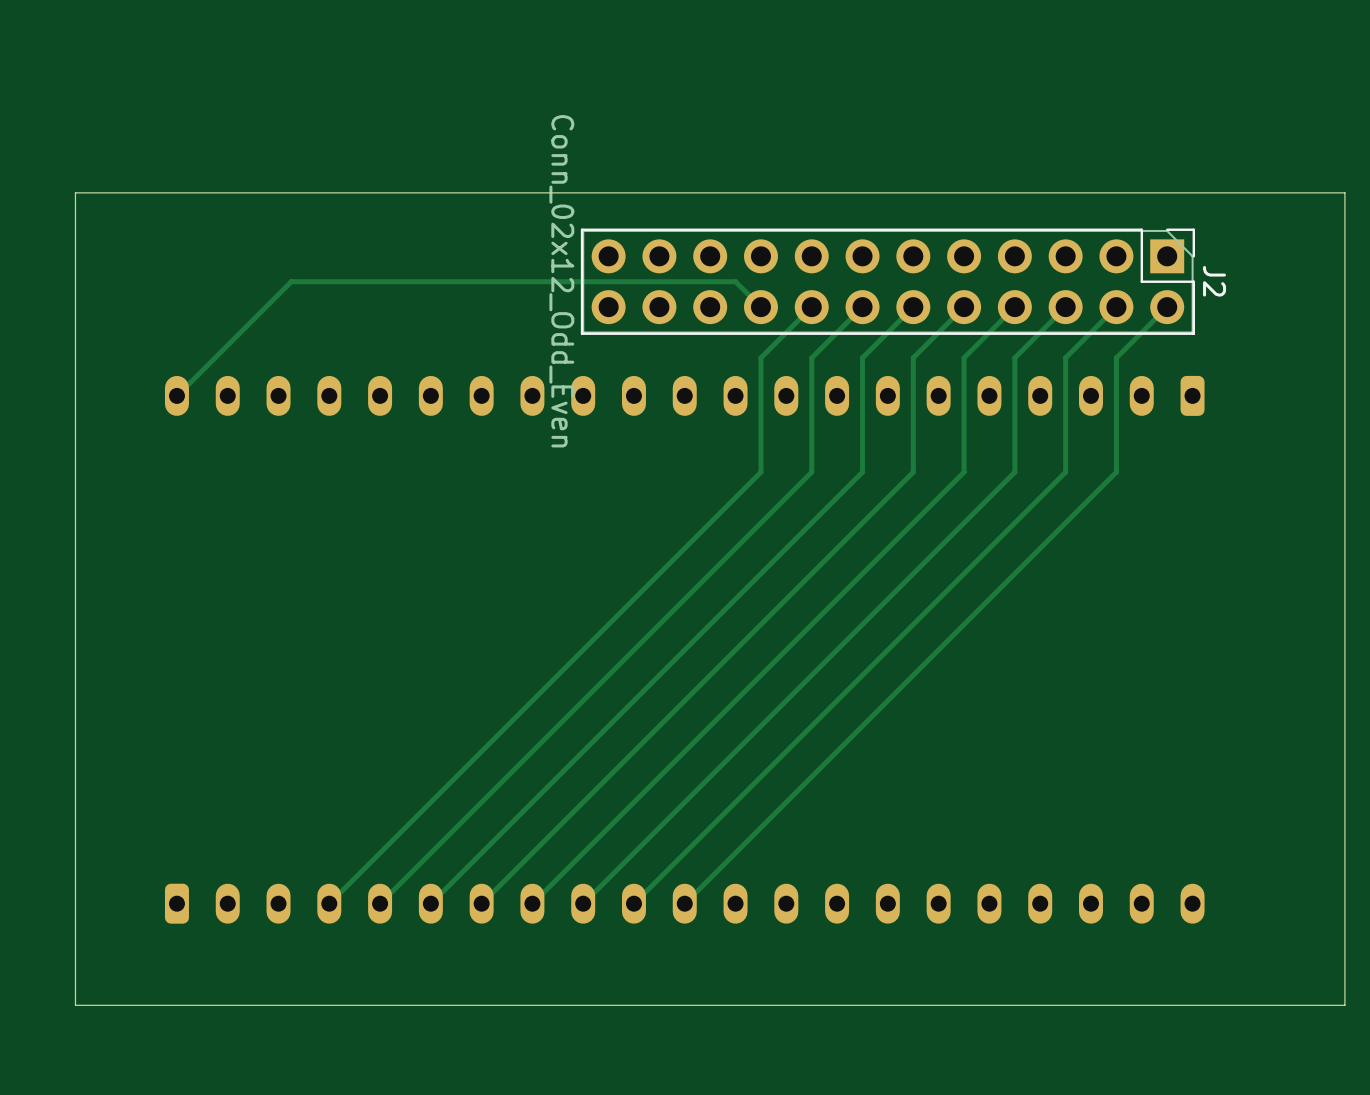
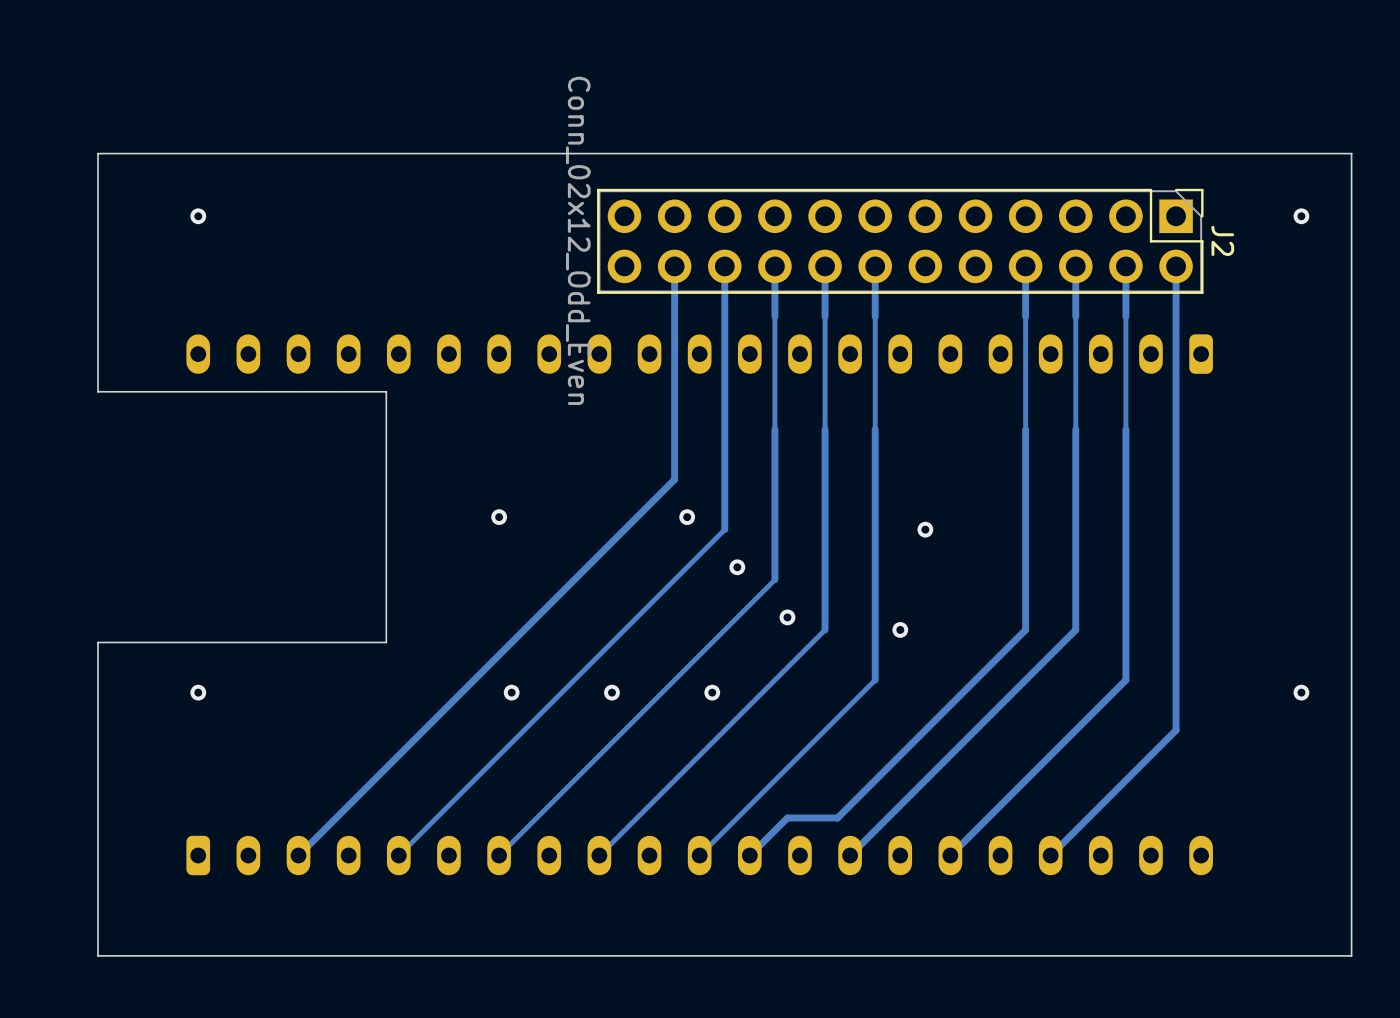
via: none -> (198, 216)
via: none -> (1301, 216)
track: none -> (674, 266) (674, 479) (298, 855)
track: none -> (724, 266) (724, 529)
track: (760, 307) (735, 281) (291, 281) (177, 395) -> (774, 266) (774, 316)
track: (811, 307) (760, 357) -> (825, 266) (825, 316)
track: (862, 307) (811, 357) -> none
track: (913, 307) (862, 357) -> (875, 266) (875, 316)
track: (964, 307) (913, 357) (913, 472) (760, 624) -> (774, 429) (774, 579)
track: (1014, 307) (964, 357) (964, 472) (532, 903) -> (1025, 266) (1025, 316)
track: (1065, 307) (1014, 357) -> (1075, 266) (1075, 316)
track: (1116, 307) (1065, 357) -> (1125, 266) (1125, 316)
track: (1167, 307) (1116, 357) -> (1176, 266) (1176, 730) (1050, 855)
board edge: (75, 434) (75, 687) -> (98, 391) (386, 391) (386, 642) (98, 642)
track: (760, 472) (329, 903) -> none
track: (811, 472) (710, 573) -> (825, 429) (825, 629)
track: (862, 472) (430, 903) -> (875, 429) (875, 680)
track: (1014, 472) (811, 675) -> (1025, 429) (1025, 629) (837, 817) (787, 817) (749, 855)
track: (1065, 472) (634, 903) -> (1075, 429) (1075, 629) (850, 855)
track: (1116, 472) (862, 726) -> (1125, 429) (1125, 680) (950, 855)
via: none -> (499, 517)
via: none -> (687, 517)
via: none -> (925, 529)
via: none -> (737, 567)
via: none -> (787, 617)
via: none -> (900, 629)
via: none -> (198, 692)
via: none -> (511, 692)
via: none -> (611, 692)
via: none -> (712, 692)
via: none -> (1301, 692)

